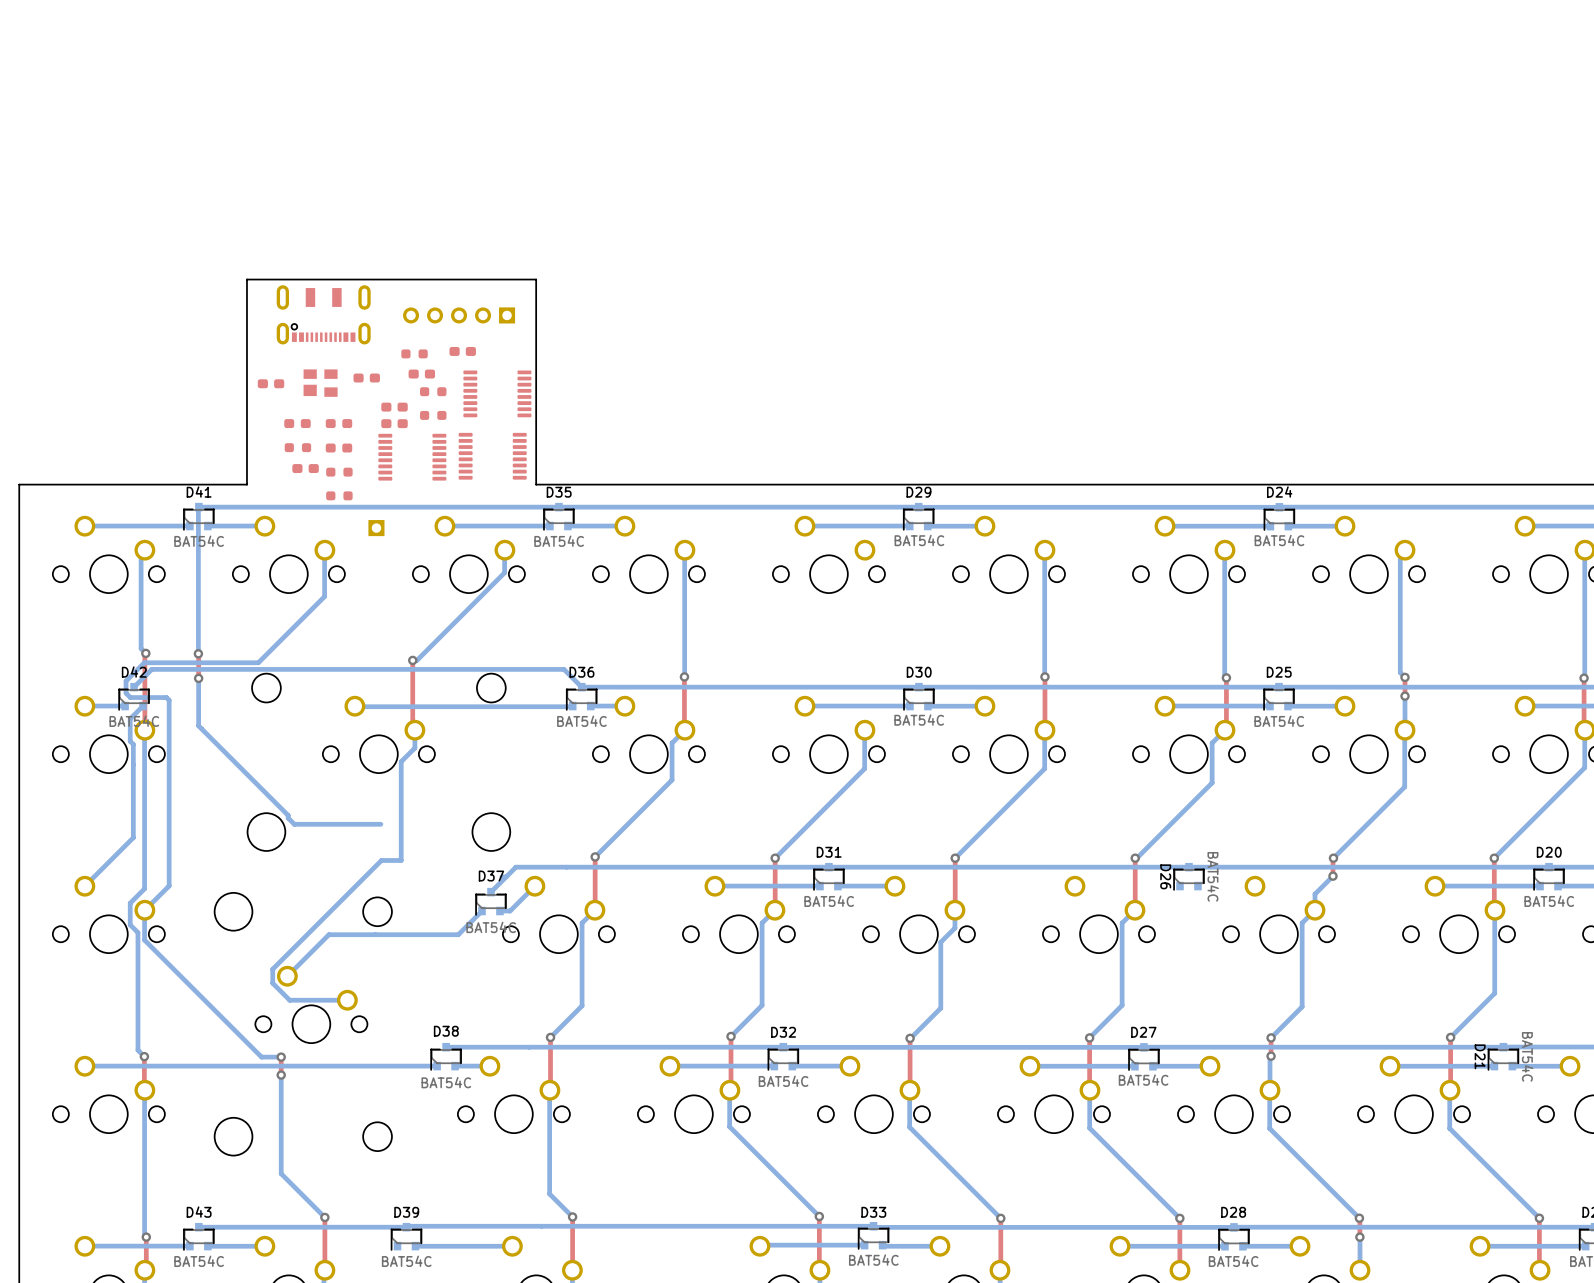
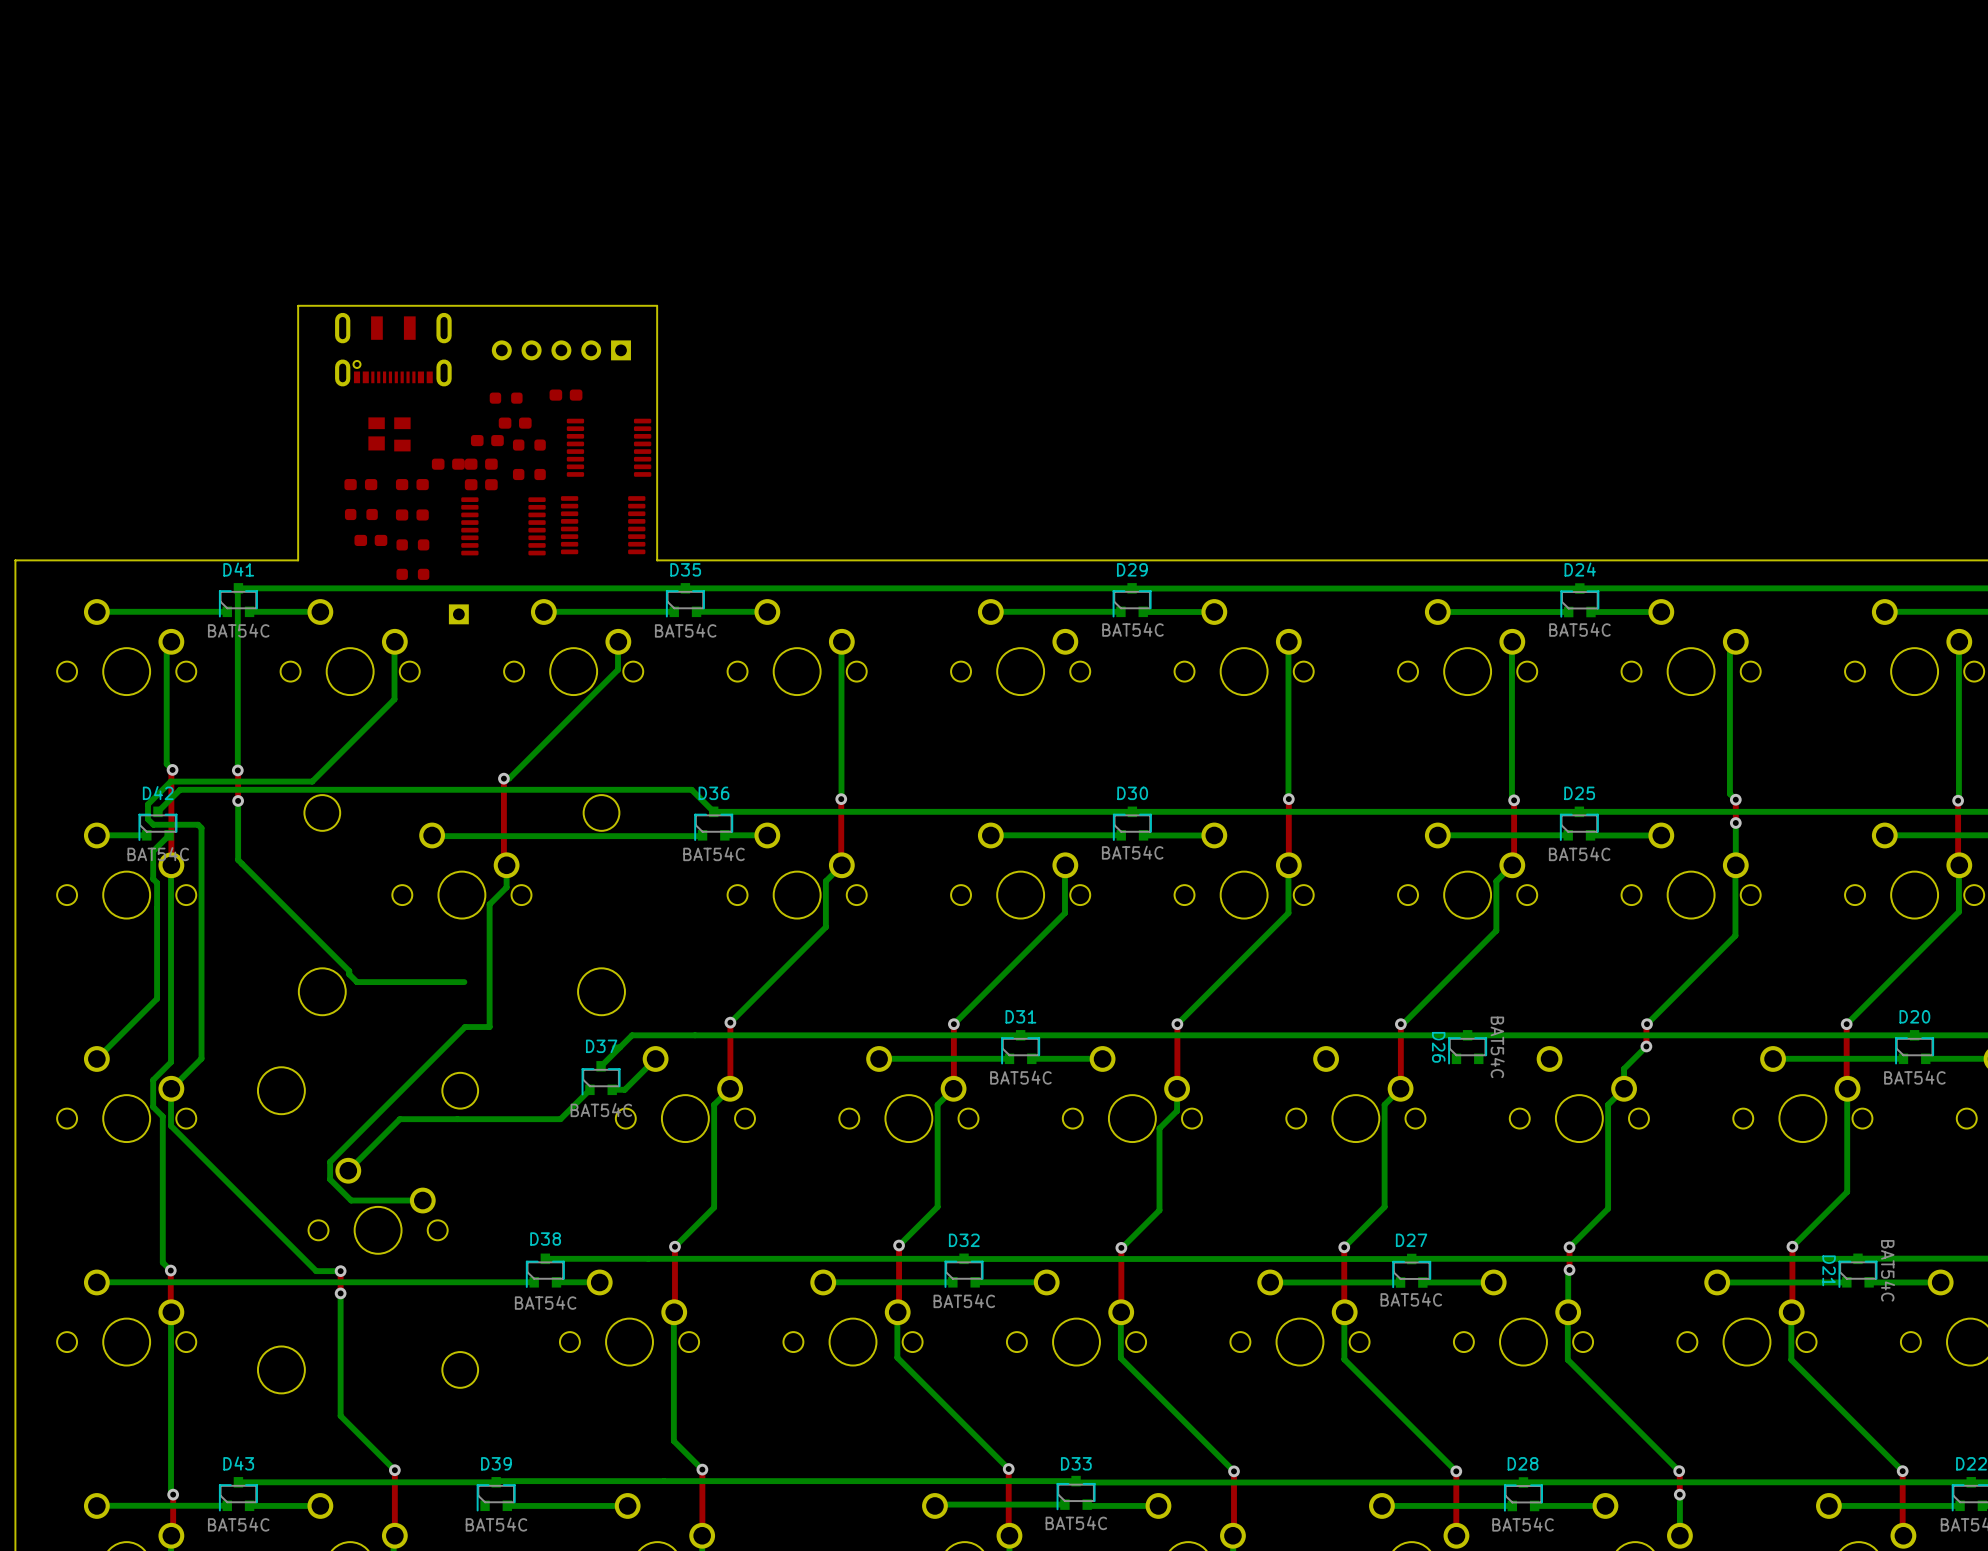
part: (366, 378) -> none
part: (271, 383) -> none
part: none -> (487, 440)
part: none -> (448, 464)

